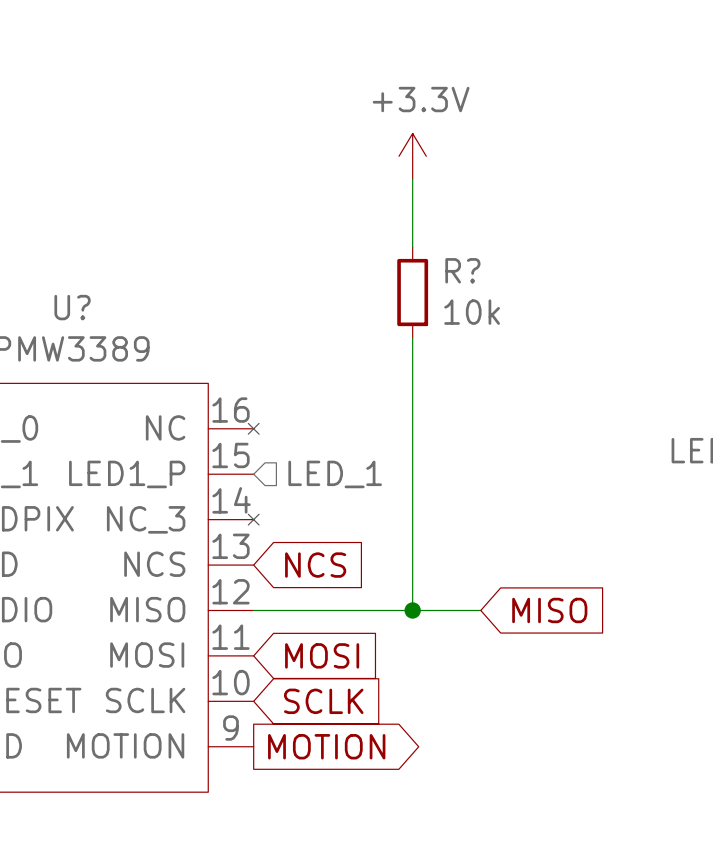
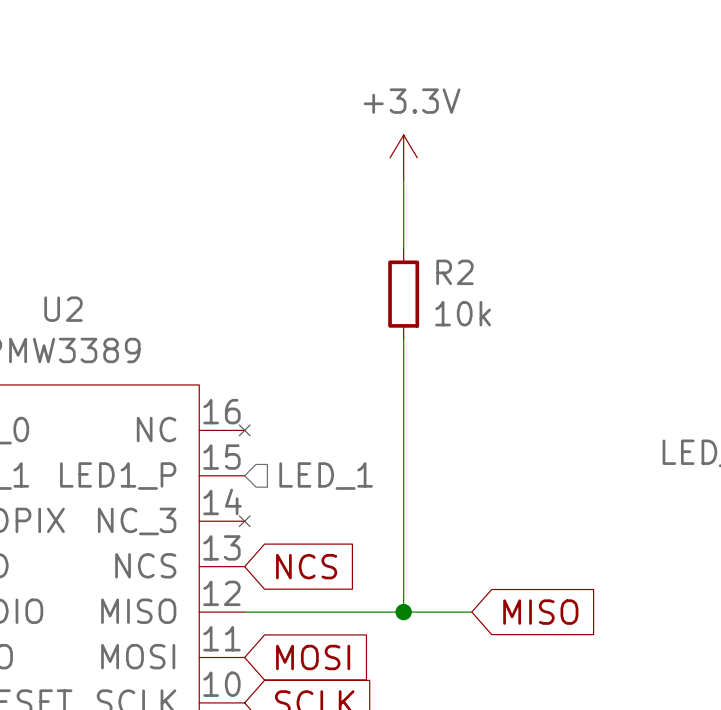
R? name: R? (462, 270) -> R2 (454, 272)
U? name: U? (72, 307) -> U2 (63, 309)

